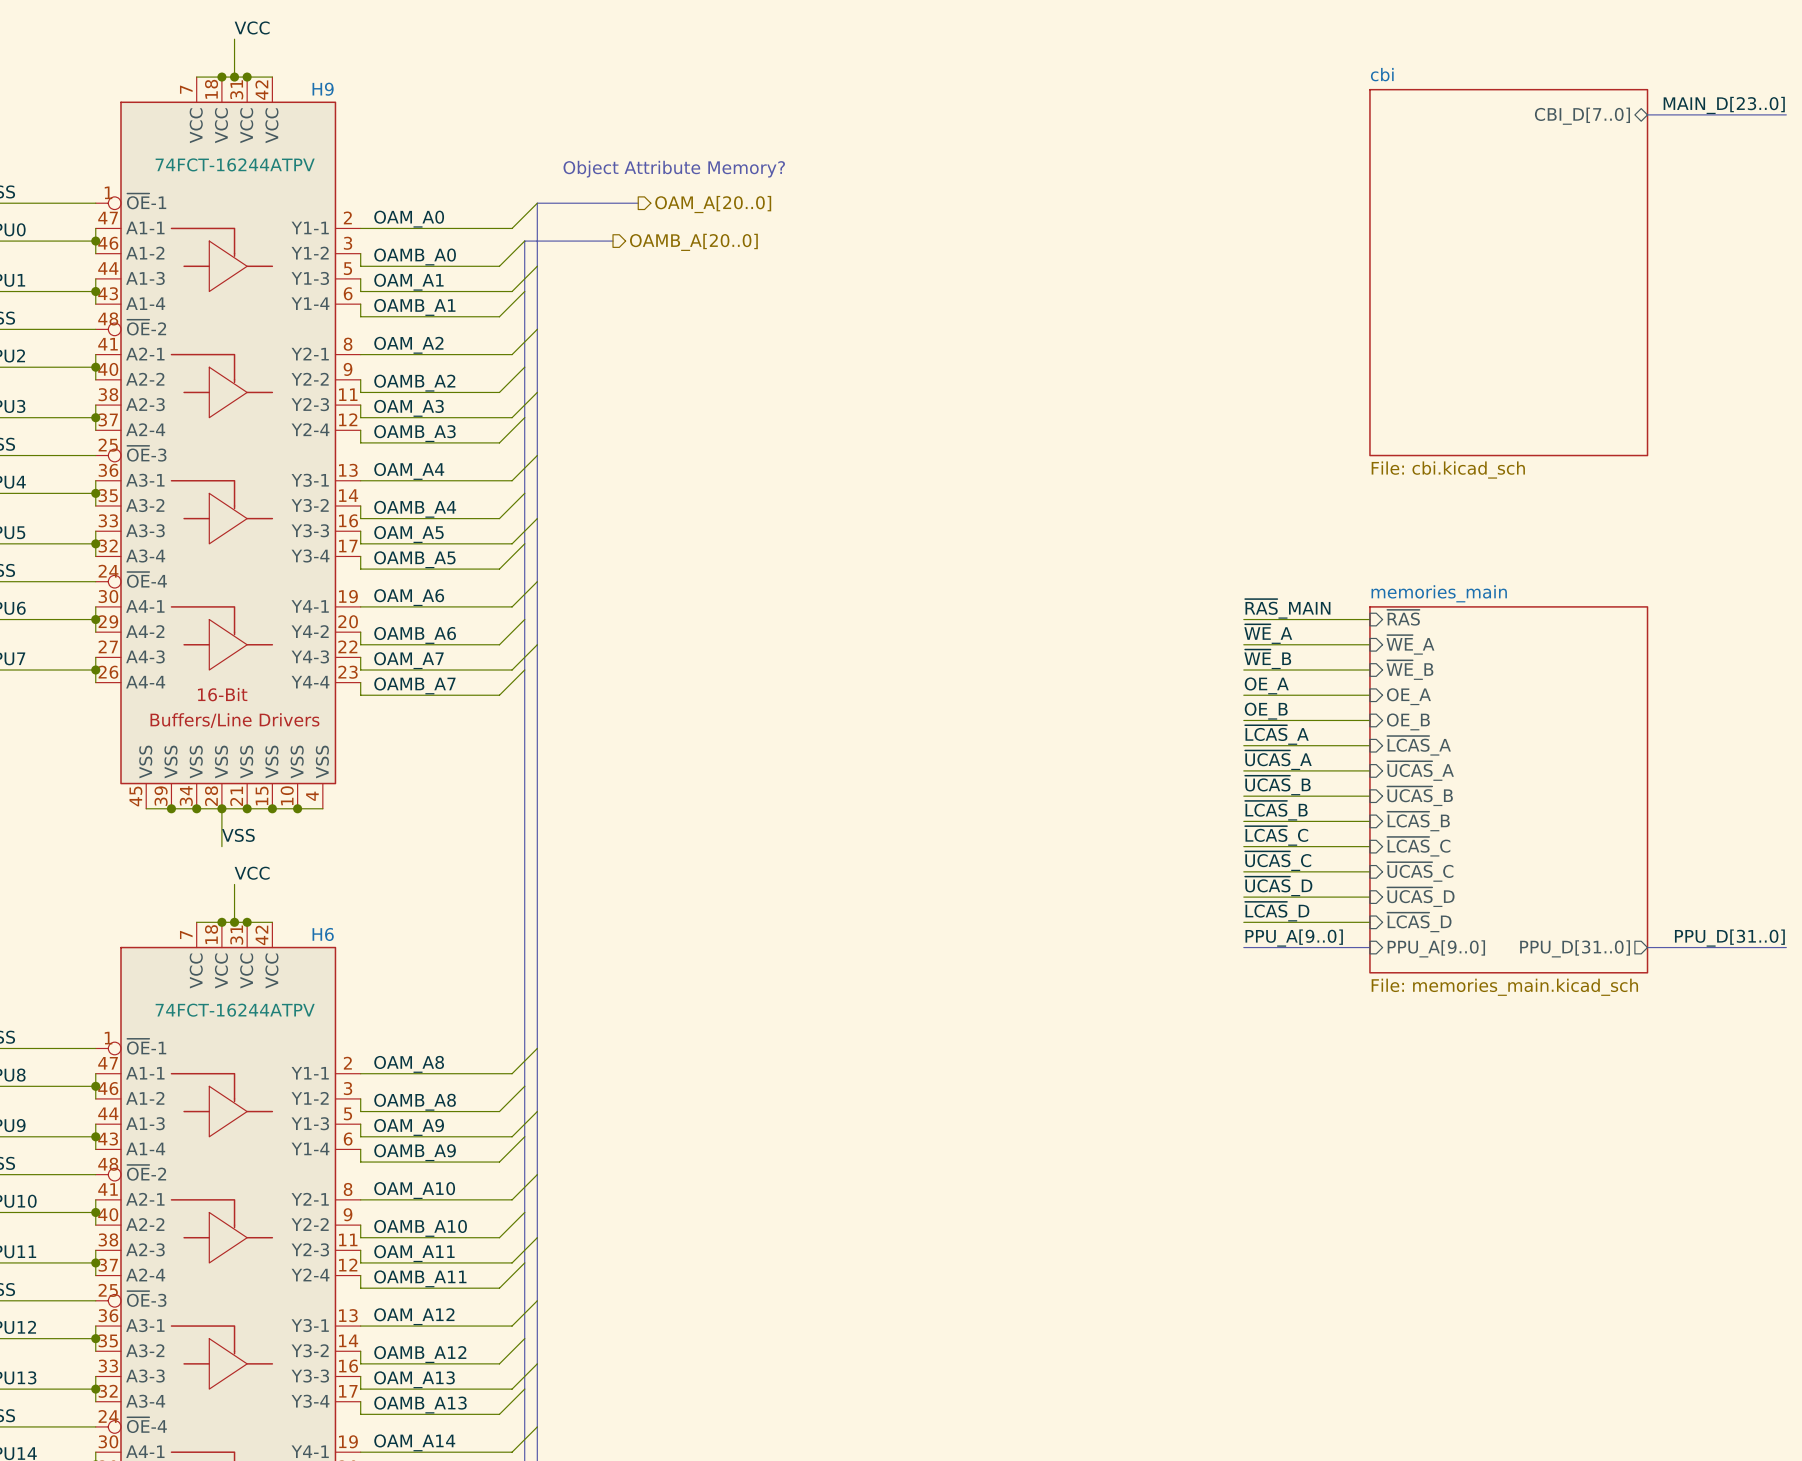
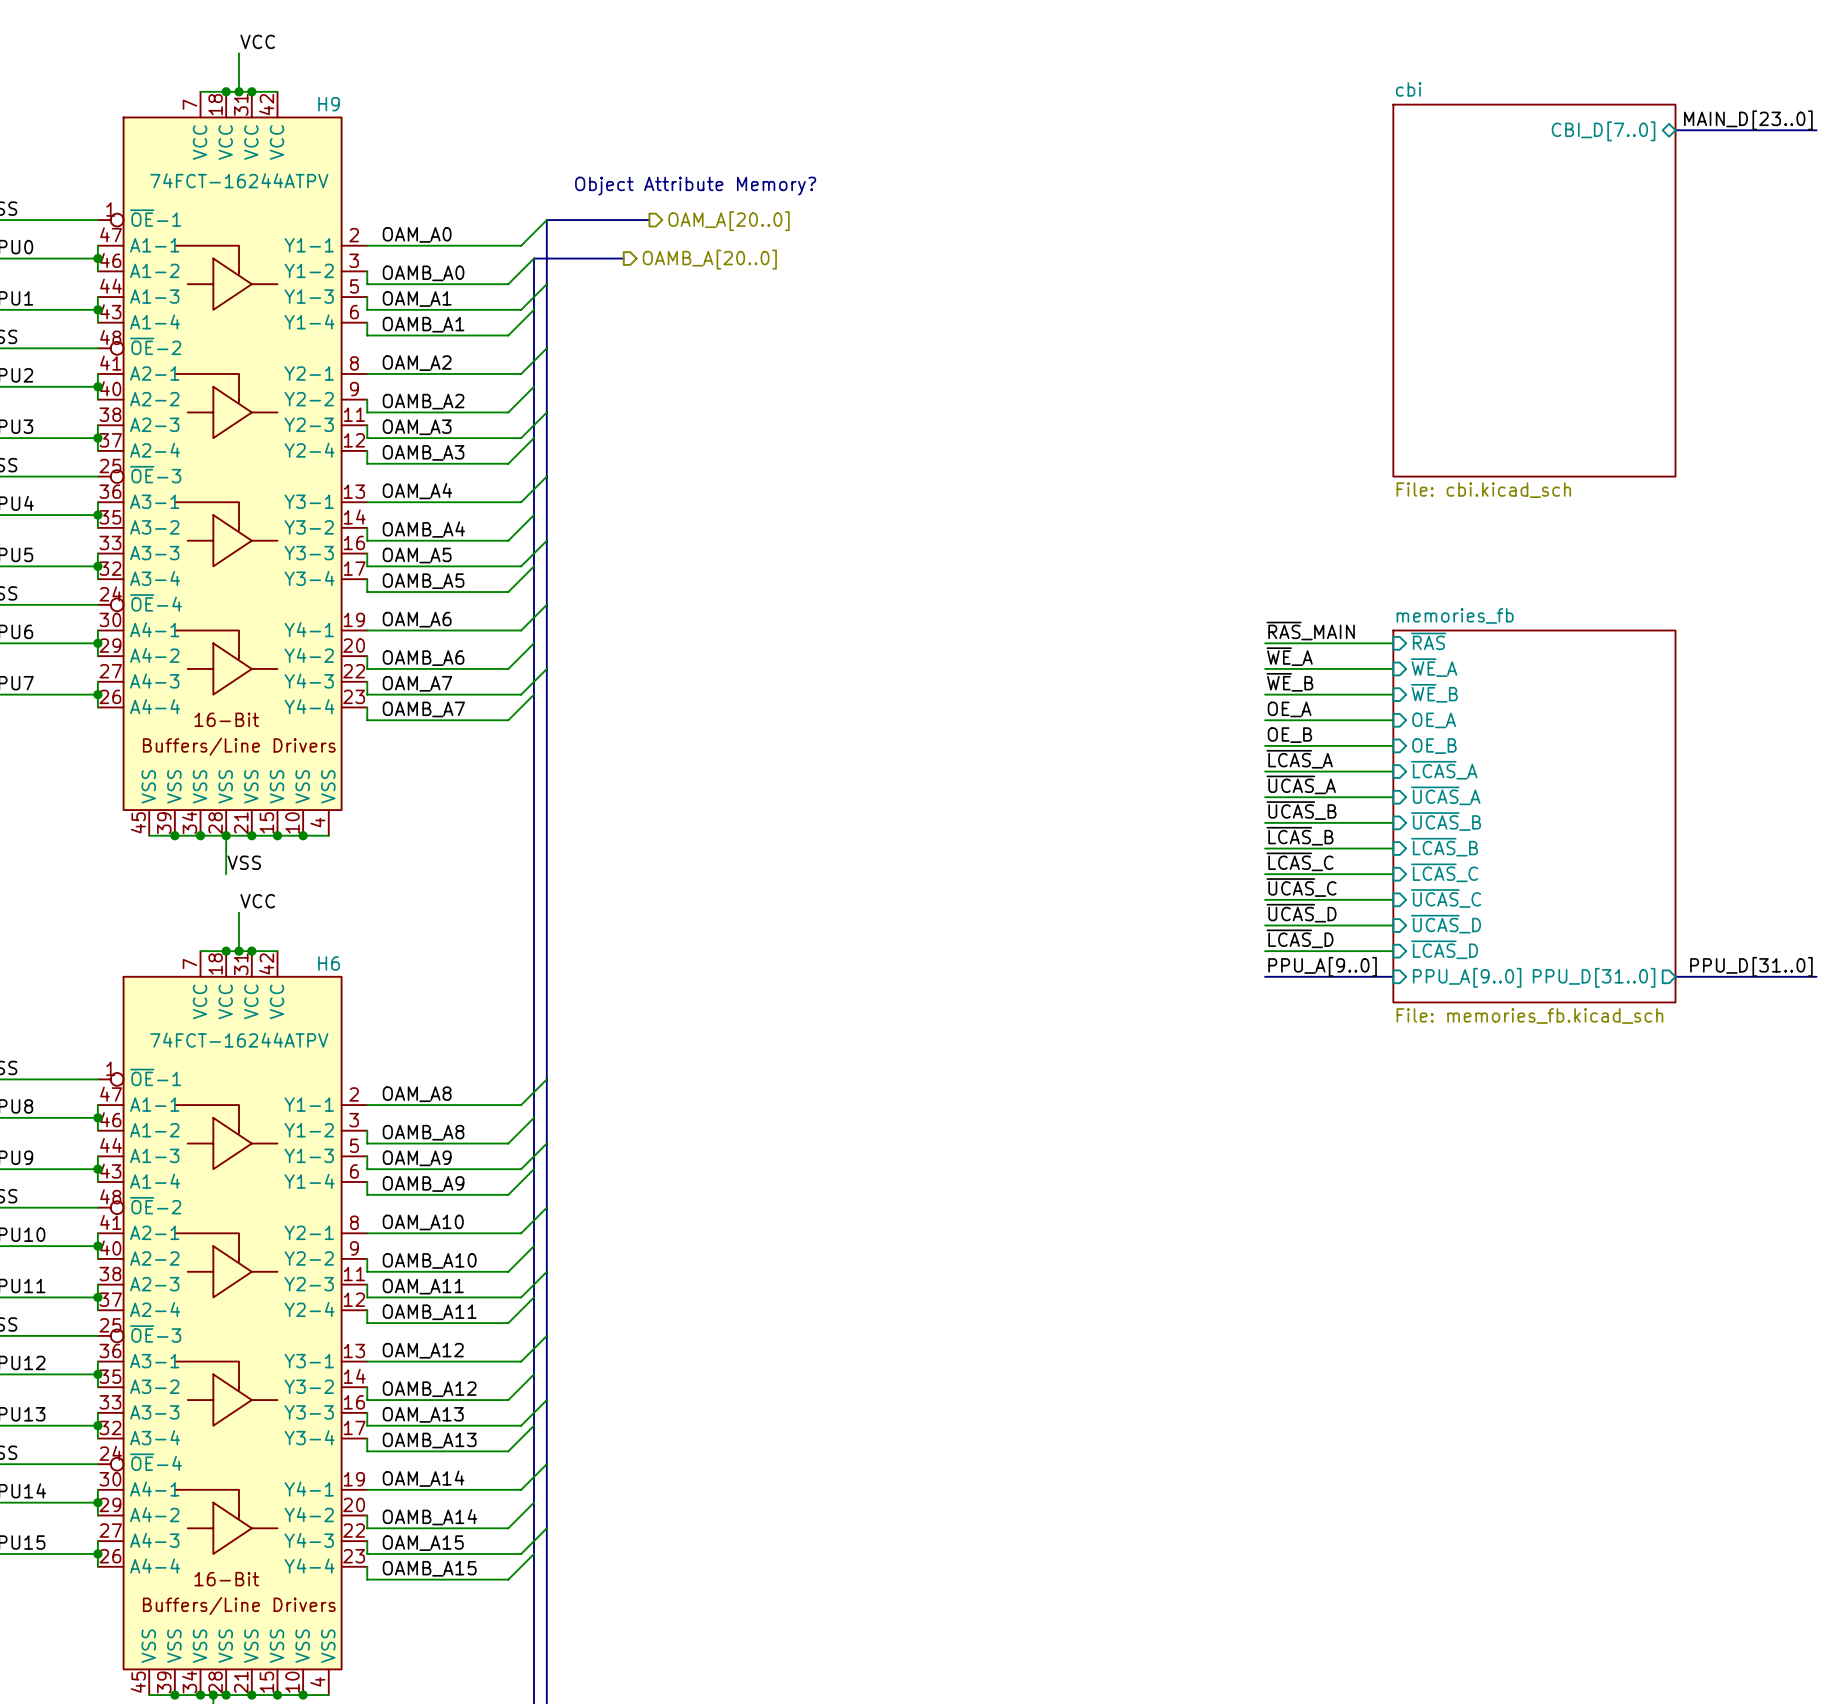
sheet memories_main name: memories_main (1439, 593) -> memories_fb (1455, 615)
sheet memories_main value: File: memories_main.kicad_sch (1504, 987) -> File: memories_fb.kicad_sch (1529, 1015)

